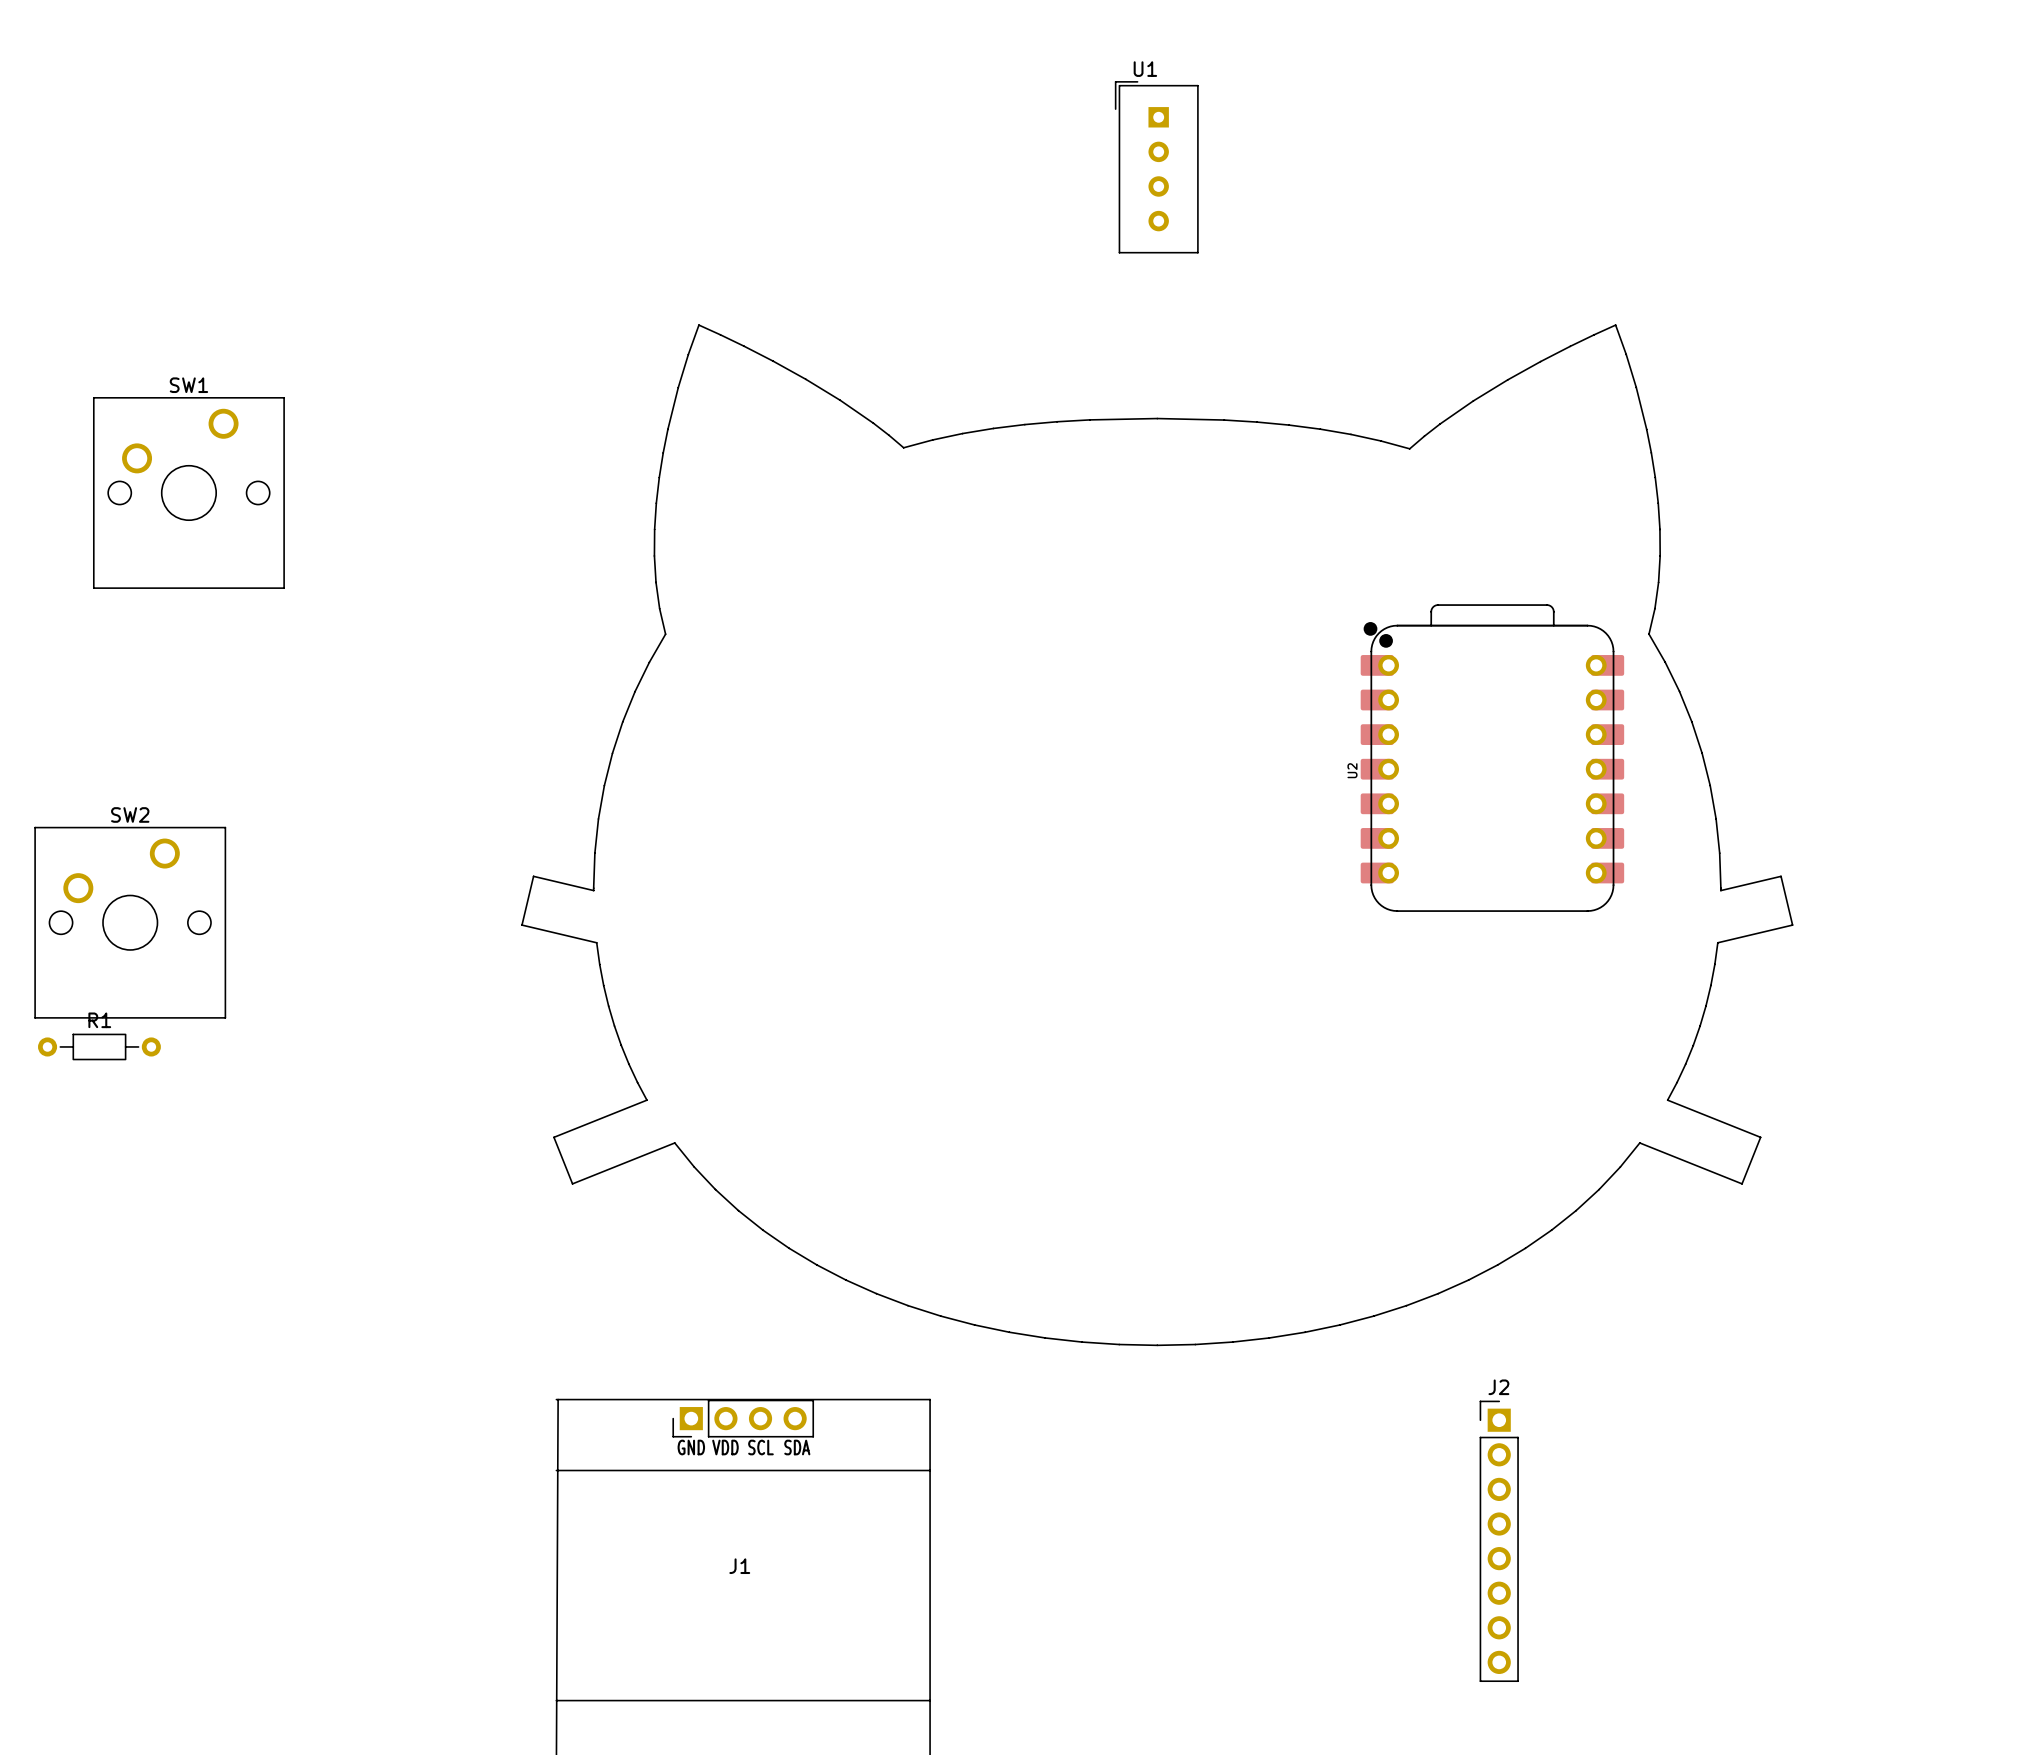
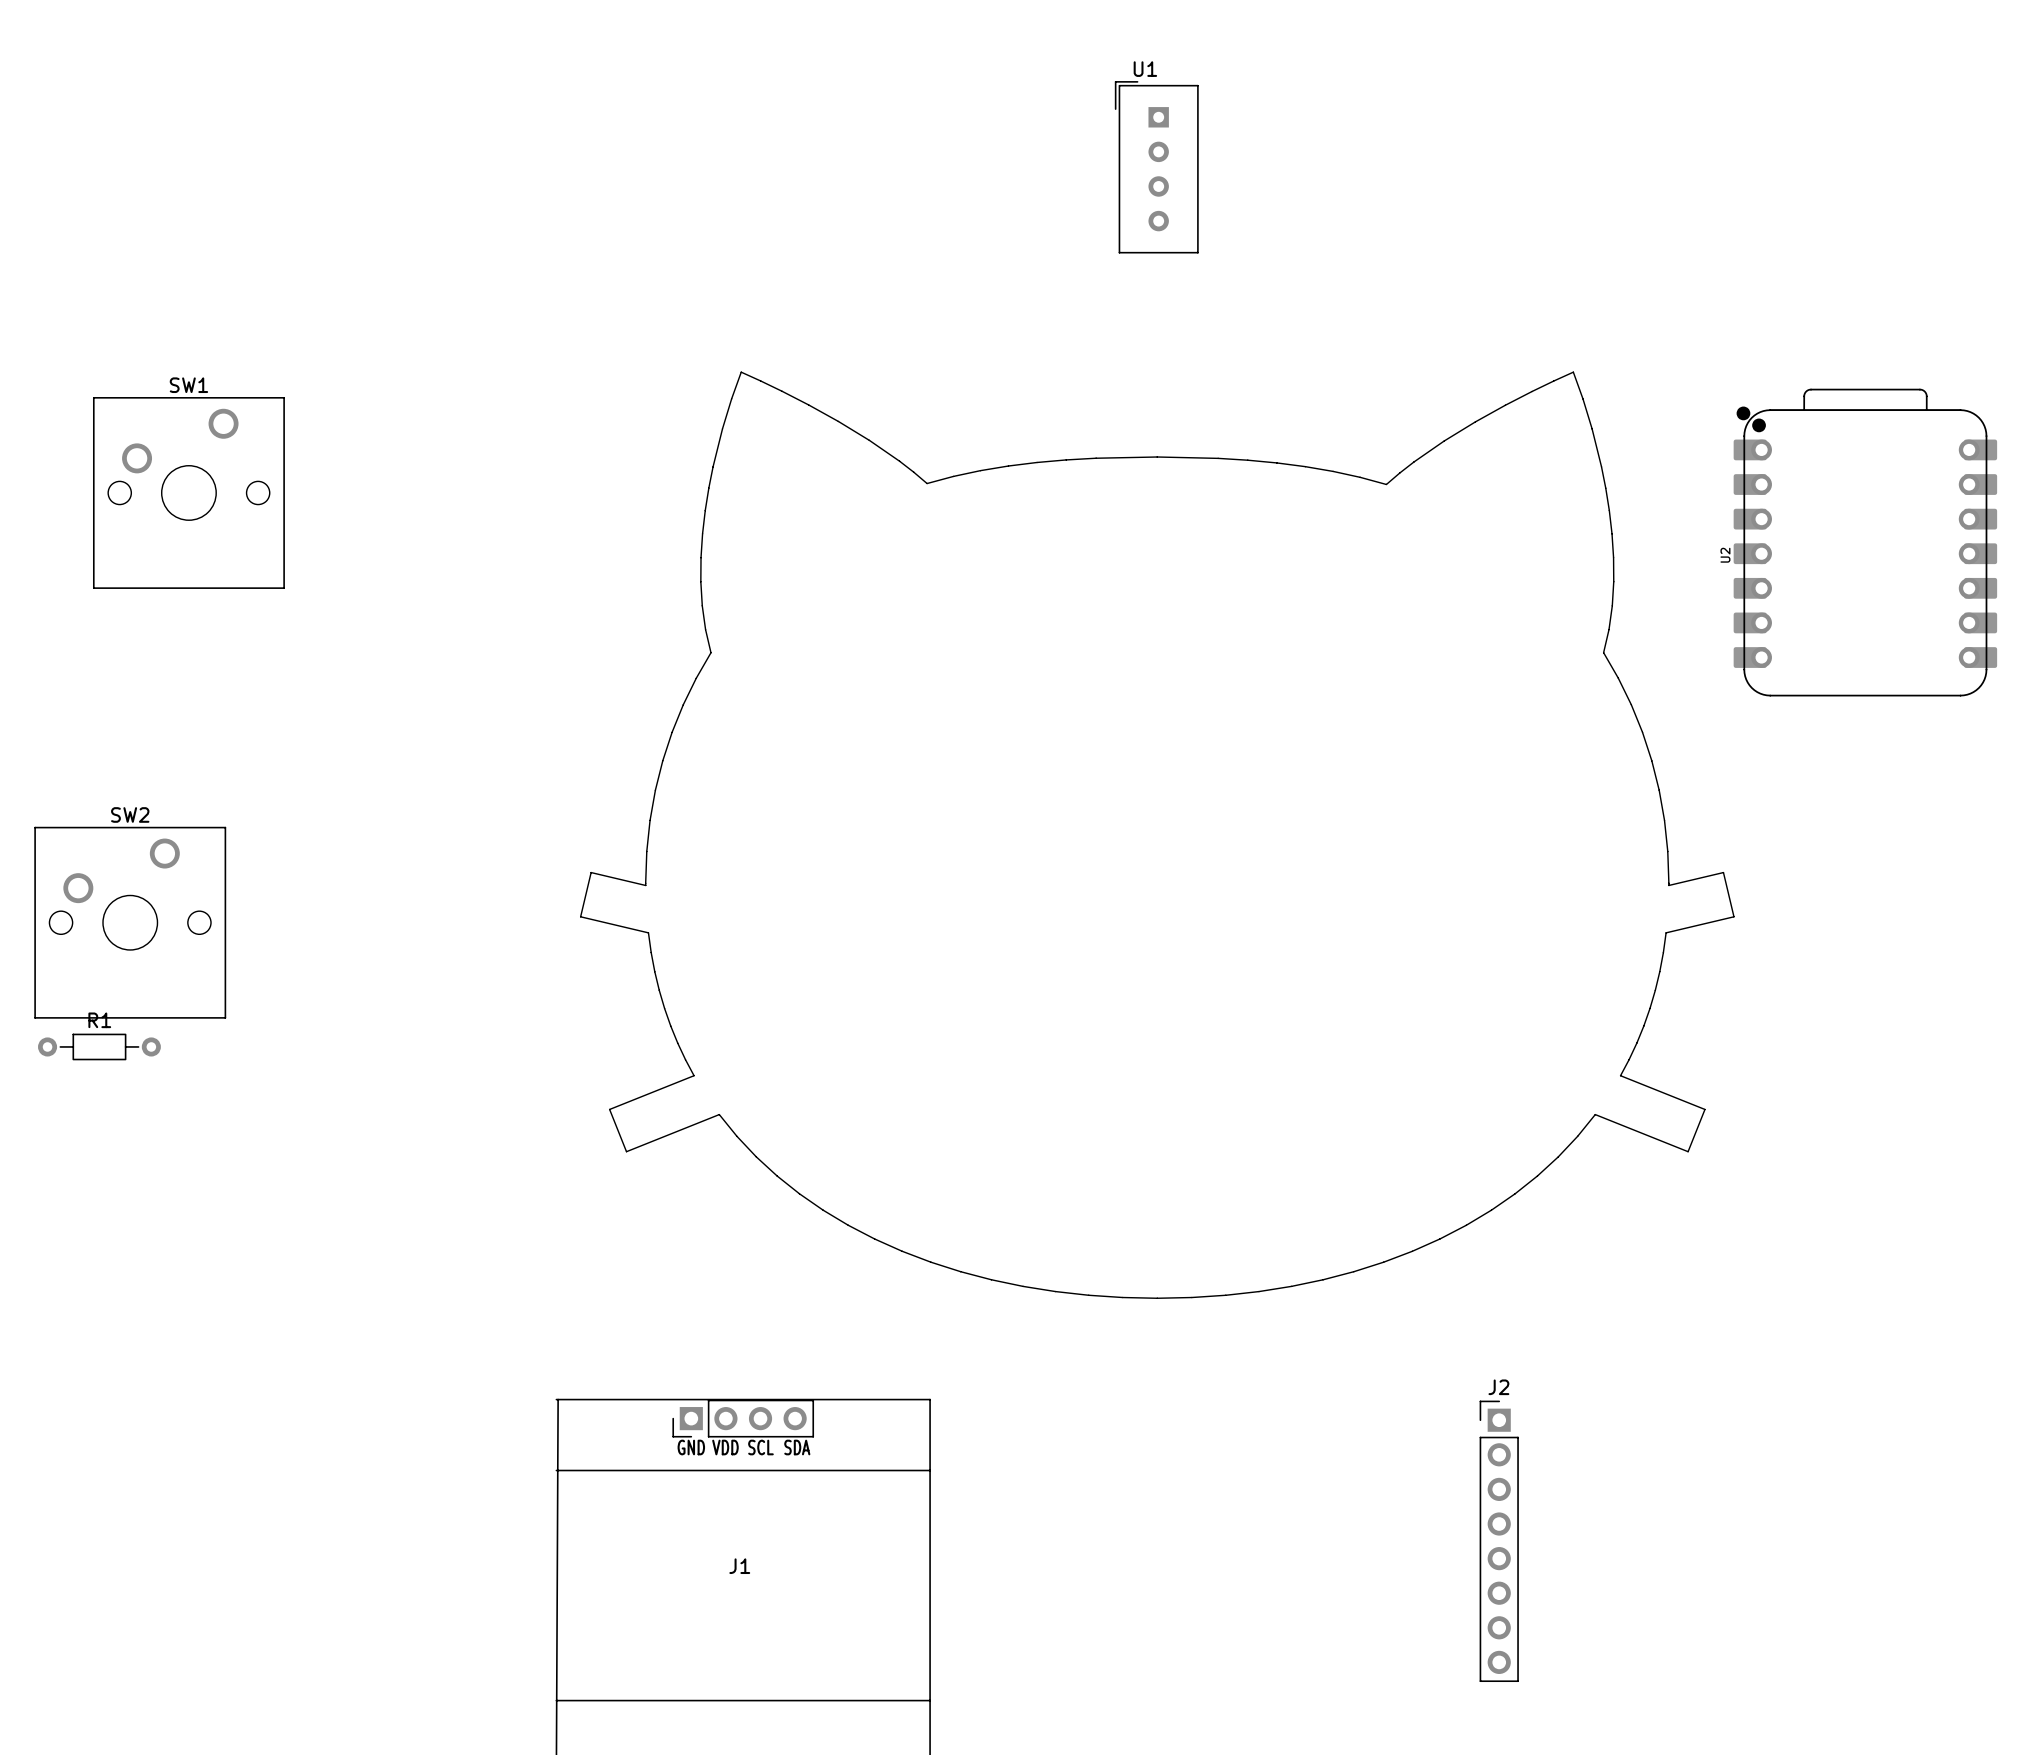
board edge: (698, 325) (678, 387) (667, 429) (656, 503) (654, 555) (656, 582) (665, 634) (635, 691) (612, 753) (598, 818) (593, 890) (533, 876) (522, 925) (596, 942) (603, 985) (614, 1026) (628, 1064) (646, 1100) (553, 1137) (572, 1183) (674, 1142) (715, 1189) (763, 1230) (816, 1264) (876, 1293) (940, 1316) (1009, 1332) (1081, 1342) (1157, 1345) (1232, 1342) (1305, 1332) (1373, 1316) (1438, 1293) (1497, 1264) (1551, 1230) (1599, 1189) (1639, 1142) (1742, 1183) (1760, 1137) (1667, 1100) (1685, 1064) (1700, 1026) (1710, 985) (1717, 942) (1792, 925) (1781, 876) (1720, 890) (1716, 818) (1702, 753) (1679, 691) (1649, 634) (1658, 582) (1660, 555) (1658, 503) (1646, 429) (1636, 387) (1615, 325) (1570, 346) (1507, 379) (1440, 424) (1409, 448) (1351, 434) (1289, 425) (1224, 420) (1157, 418) (1089, 419) (1024, 424) (962, 433) (903, 447) (873, 423) (806, 379) (743, 346) (698, 325) -> (741, 372) (722, 428) (713, 466) (702, 533) (700, 581) (702, 605) (710, 652) (683, 704) (662, 760) (650, 820) (645, 885) (591, 872) (580, 916) (648, 932) (654, 971) (664, 1008) (677, 1043) (694, 1075) (609, 1109) (626, 1151) (719, 1114) (756, 1156) (799, 1193) (848, 1225) (902, 1251) (960, 1271) (1023, 1286) (1088, 1295) (1157, 1298) (1225, 1295) (1291, 1286) (1353, 1271) (1412, 1251) (1466, 1225) (1515, 1193) (1558, 1156) (1595, 1114) (1688, 1151) (1704, 1109) (1620, 1075) (1636, 1043) (1650, 1008) (1659, 971) (1666, 932) (1733, 916) (1723, 872) (1668, 885) (1664, 820) (1651, 760) (1631, 704) (1603, 652) (1612, 605) (1613, 581) (1612, 533) (1601, 466) (1592, 428) (1573, 372) (1475, 421) (1413, 462) (1386, 484) (1333, 471) (1276, 462) (1218, 458) (1157, 457) (1096, 458) (1037, 462) (980, 470) (927, 483) (899, 461) (838, 421) (741, 372)
U2 position: (1492, 758) -> (1865, 542)

